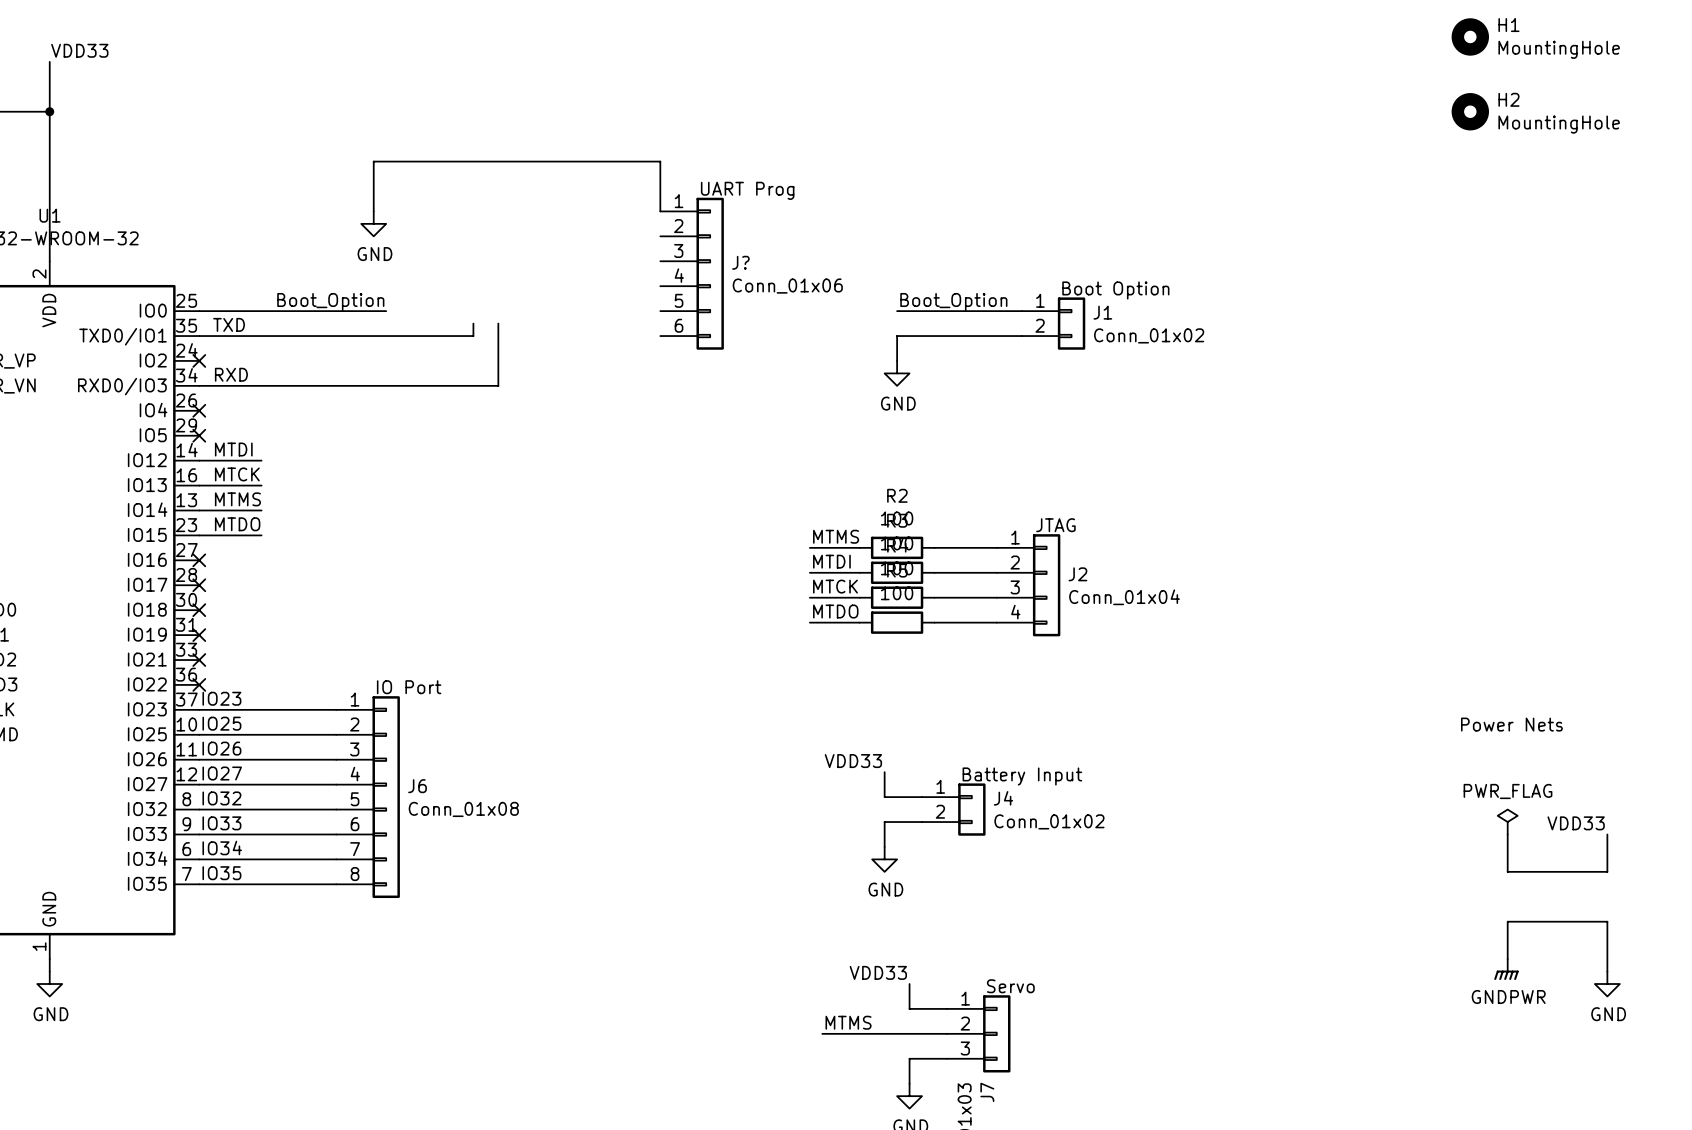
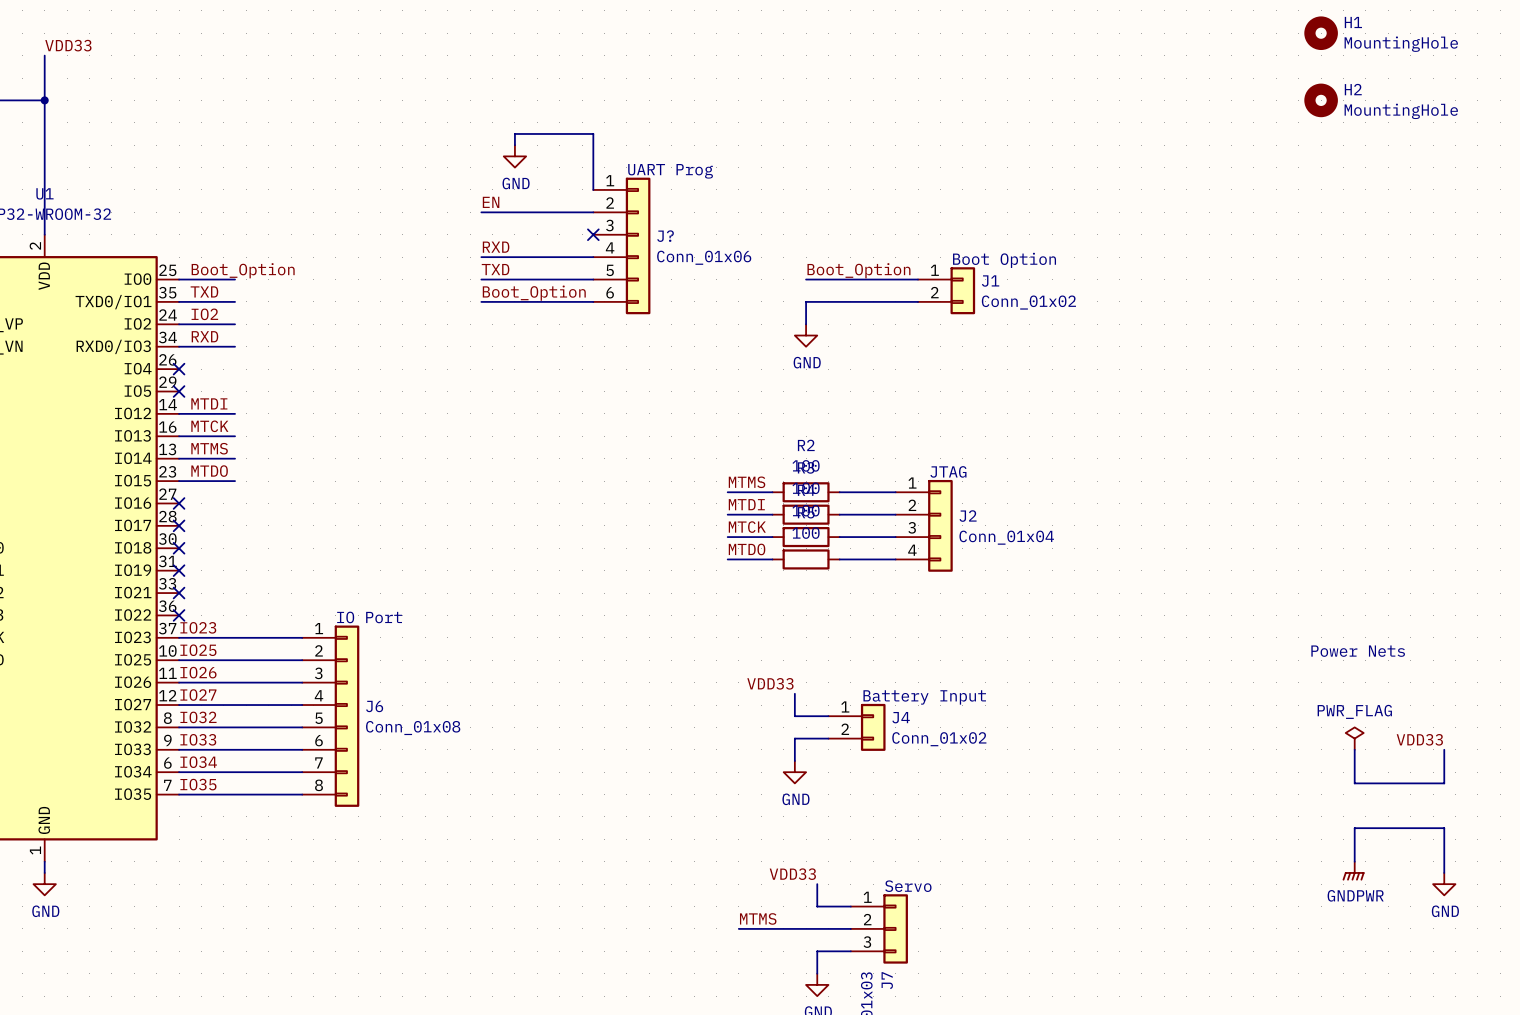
wire: (660, 161) (373, 161) (373, 211) -> (593, 145) (593, 133) (514, 133) (514, 145)
power symbol position: GND (373, 223) -> GND (514, 156)
label: none -> EN (491, 202)
wire: none -> (481, 212) (593, 212)
no-connect mark: none -> (593, 234)
label: none -> RXD (496, 247)
wire: none -> (481, 257) (593, 257)
label: none -> TXD (495, 269)
label position: Boot_Option (330, 302) -> Boot_Option (243, 270)
wire: (261, 311) (386, 311) -> none
wire: none -> (481, 279) (593, 279)
wire: (473, 323) (473, 336) (261, 336) -> none
wire: (498, 323) (498, 385) (261, 385) -> none
label: none -> Boot_Option (534, 293)
wire: none -> (481, 301) (593, 301)
label: none -> IO2 (204, 314)
wire: none -> (179, 324) (235, 324)
no-connect mark: (199, 360) -> none

